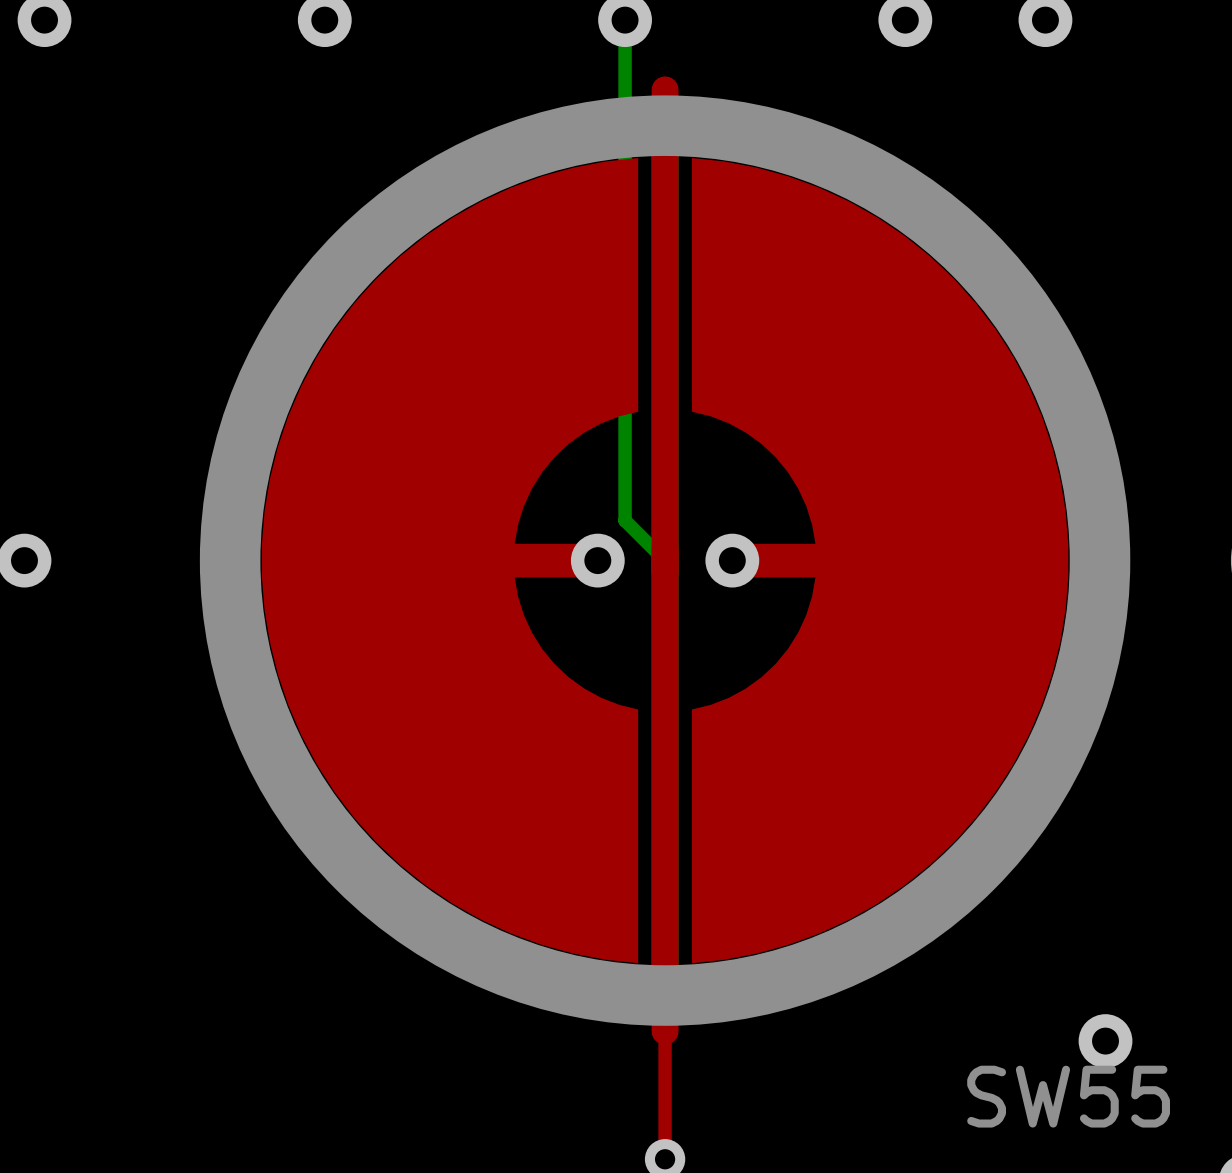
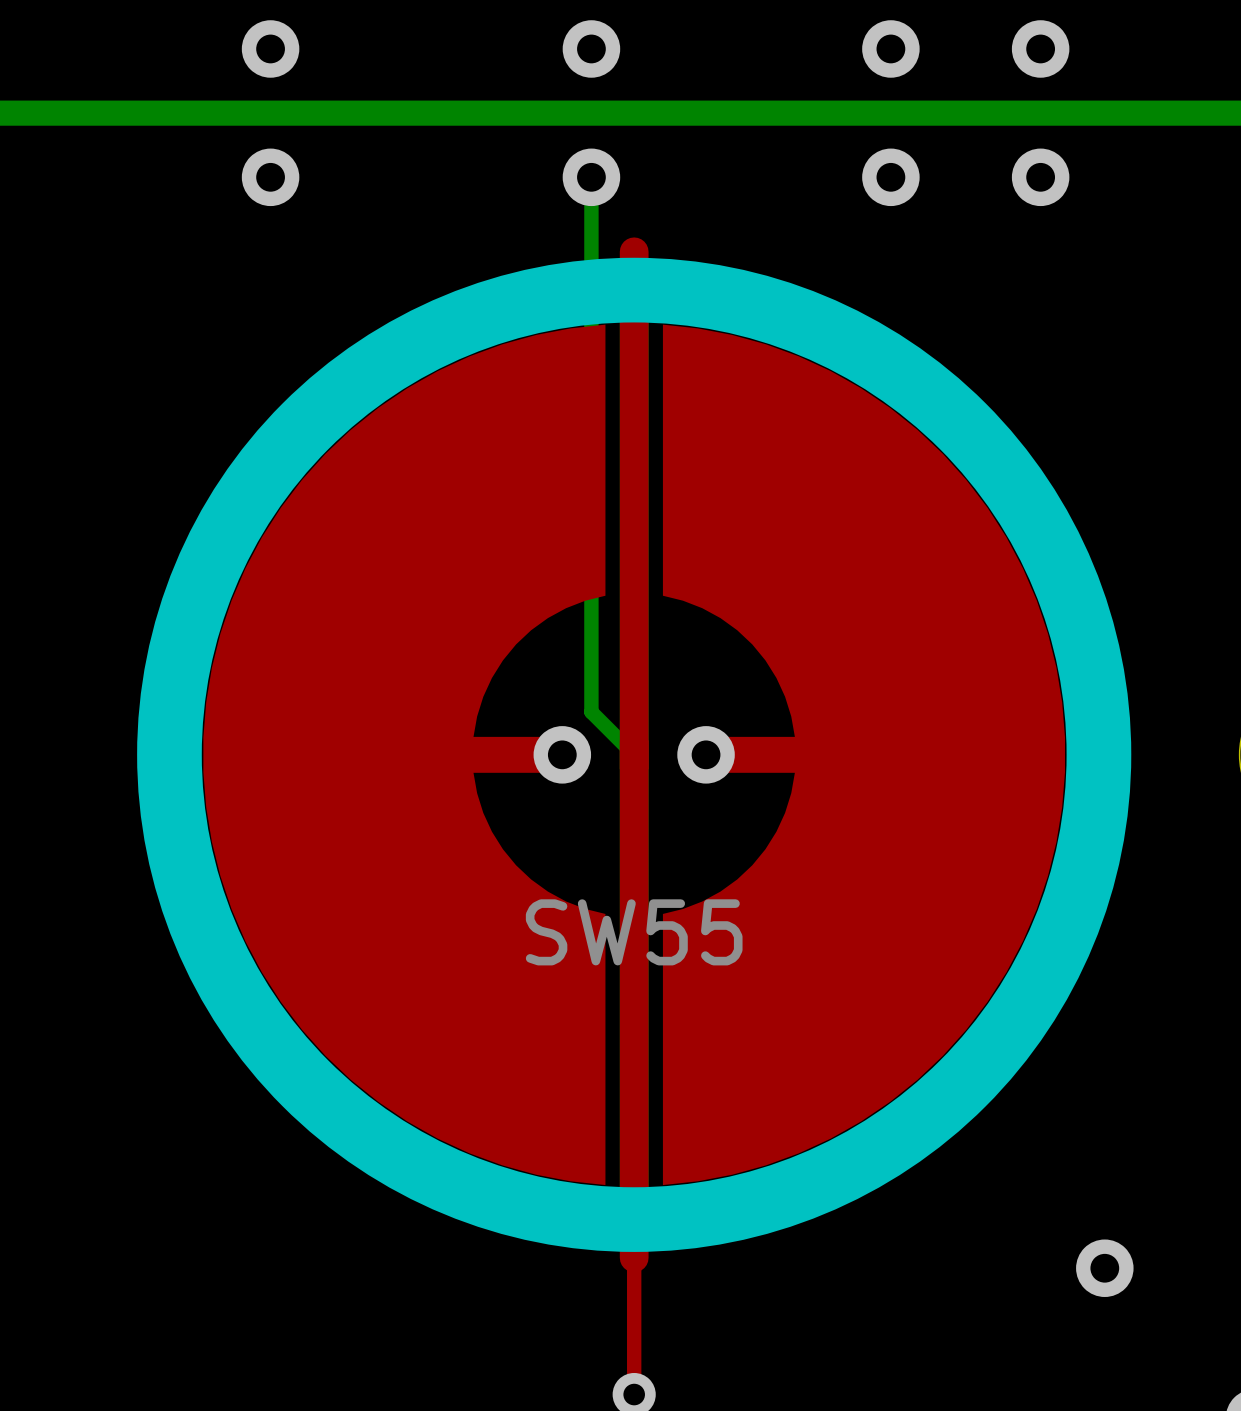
SW55 footprint: [199, 76, 1131, 1045] -> [137, 237, 1132, 1273]
SW55 name position: SW55 (1068, 1096) -> SW55 (634, 932)

